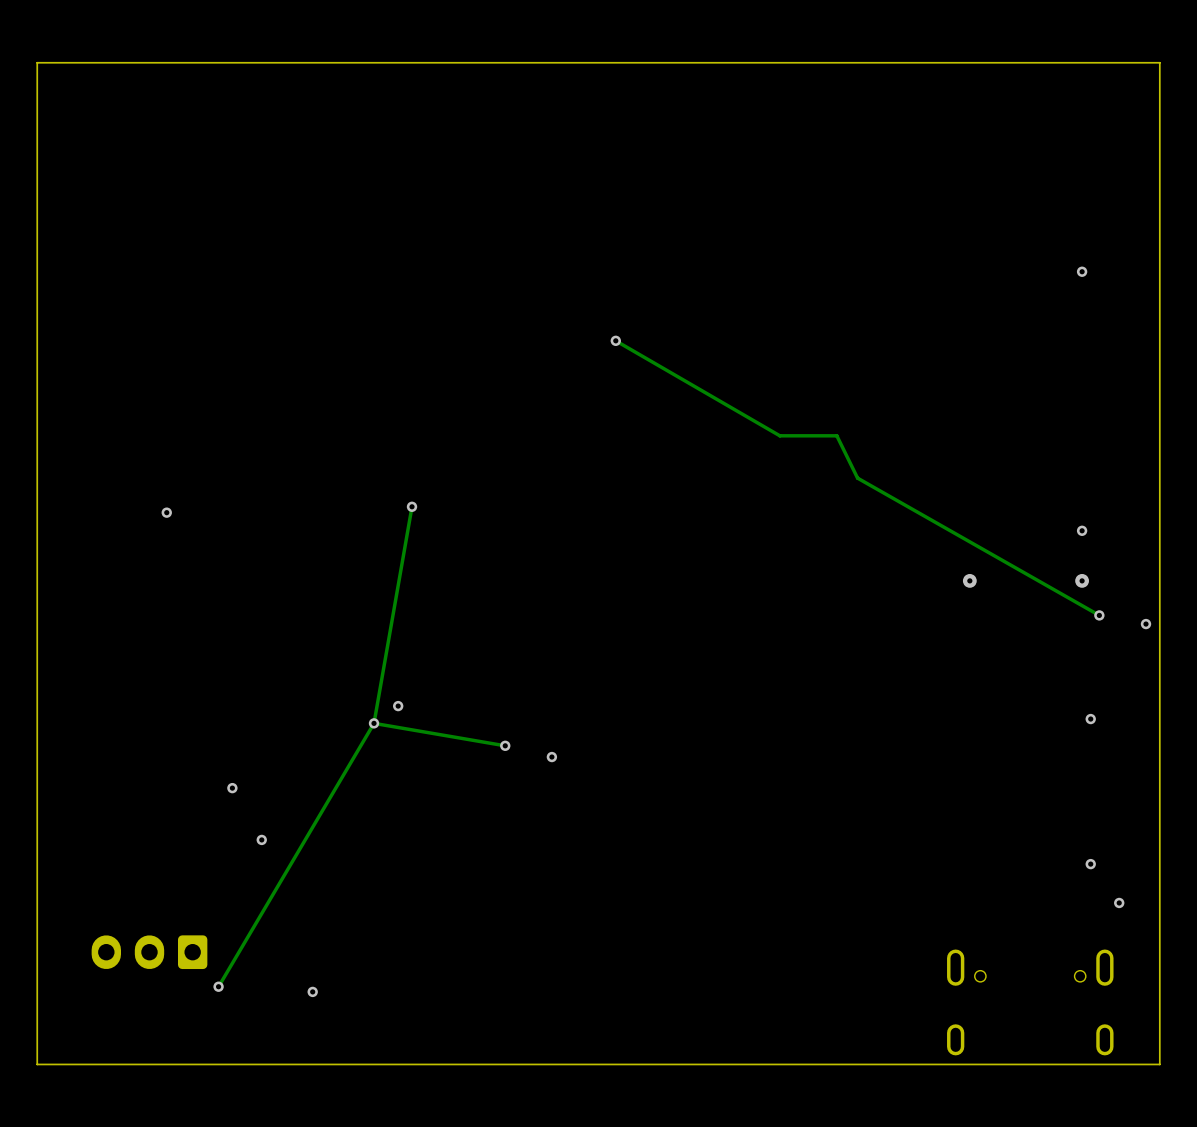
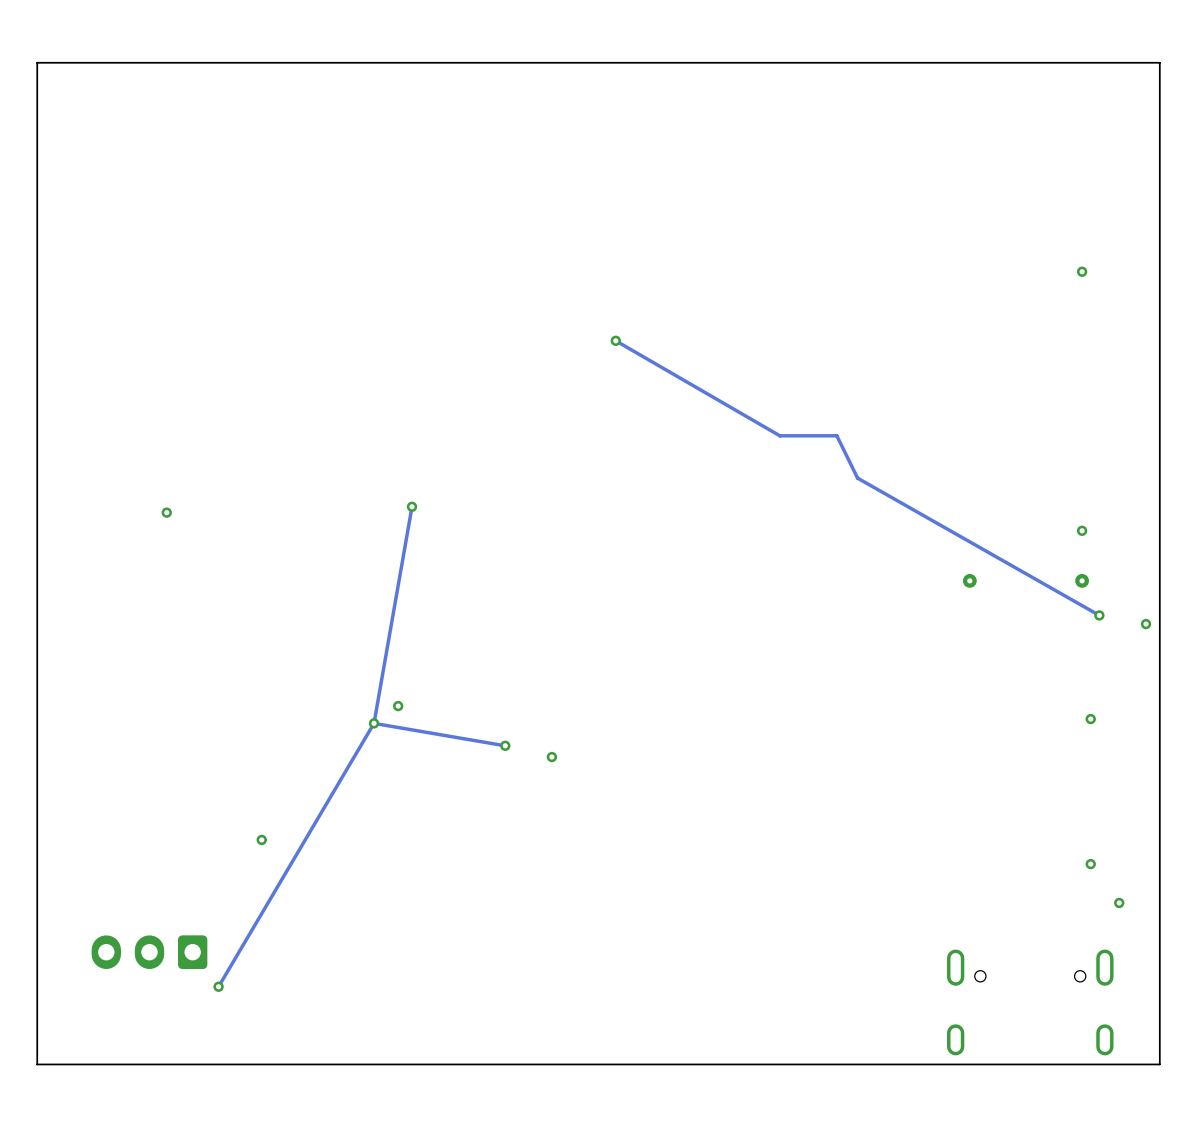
via: (232, 788) -> none
via: (312, 991) -> none

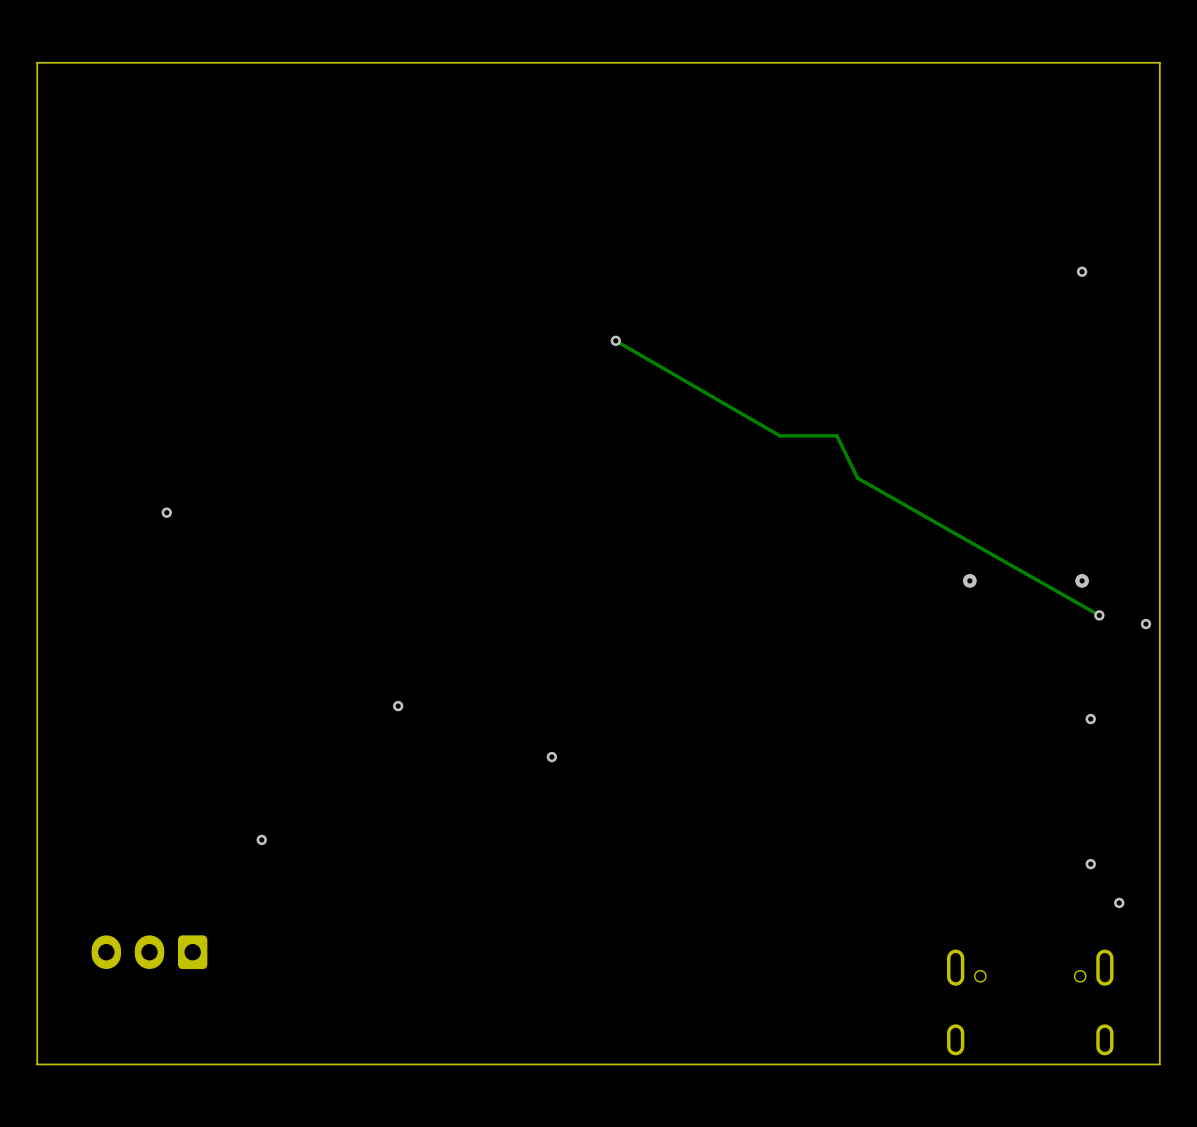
track: (412, 506) (374, 723) -> none
via: (412, 506) -> none
via: (1082, 530) -> none
track: (374, 723) (218, 986) -> none
track: (374, 723) (505, 745) -> none
via: (374, 723) -> none
via: (505, 745) -> none
via: (218, 986) -> none

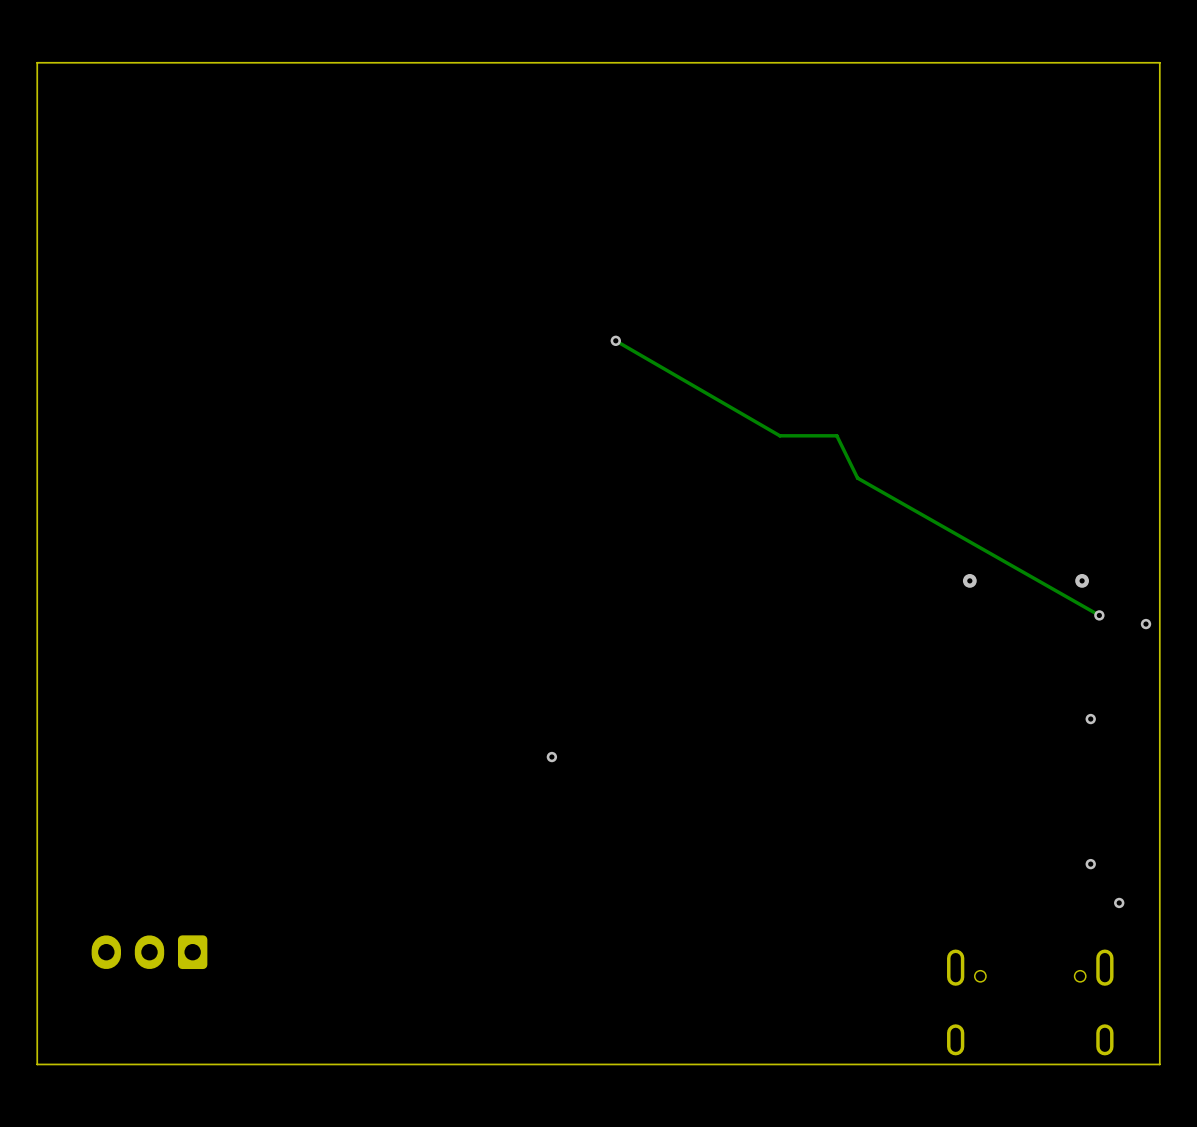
via: (1082, 271) -> none
via: (166, 512) -> none
via: (398, 706) -> none
via: (261, 839) -> none

